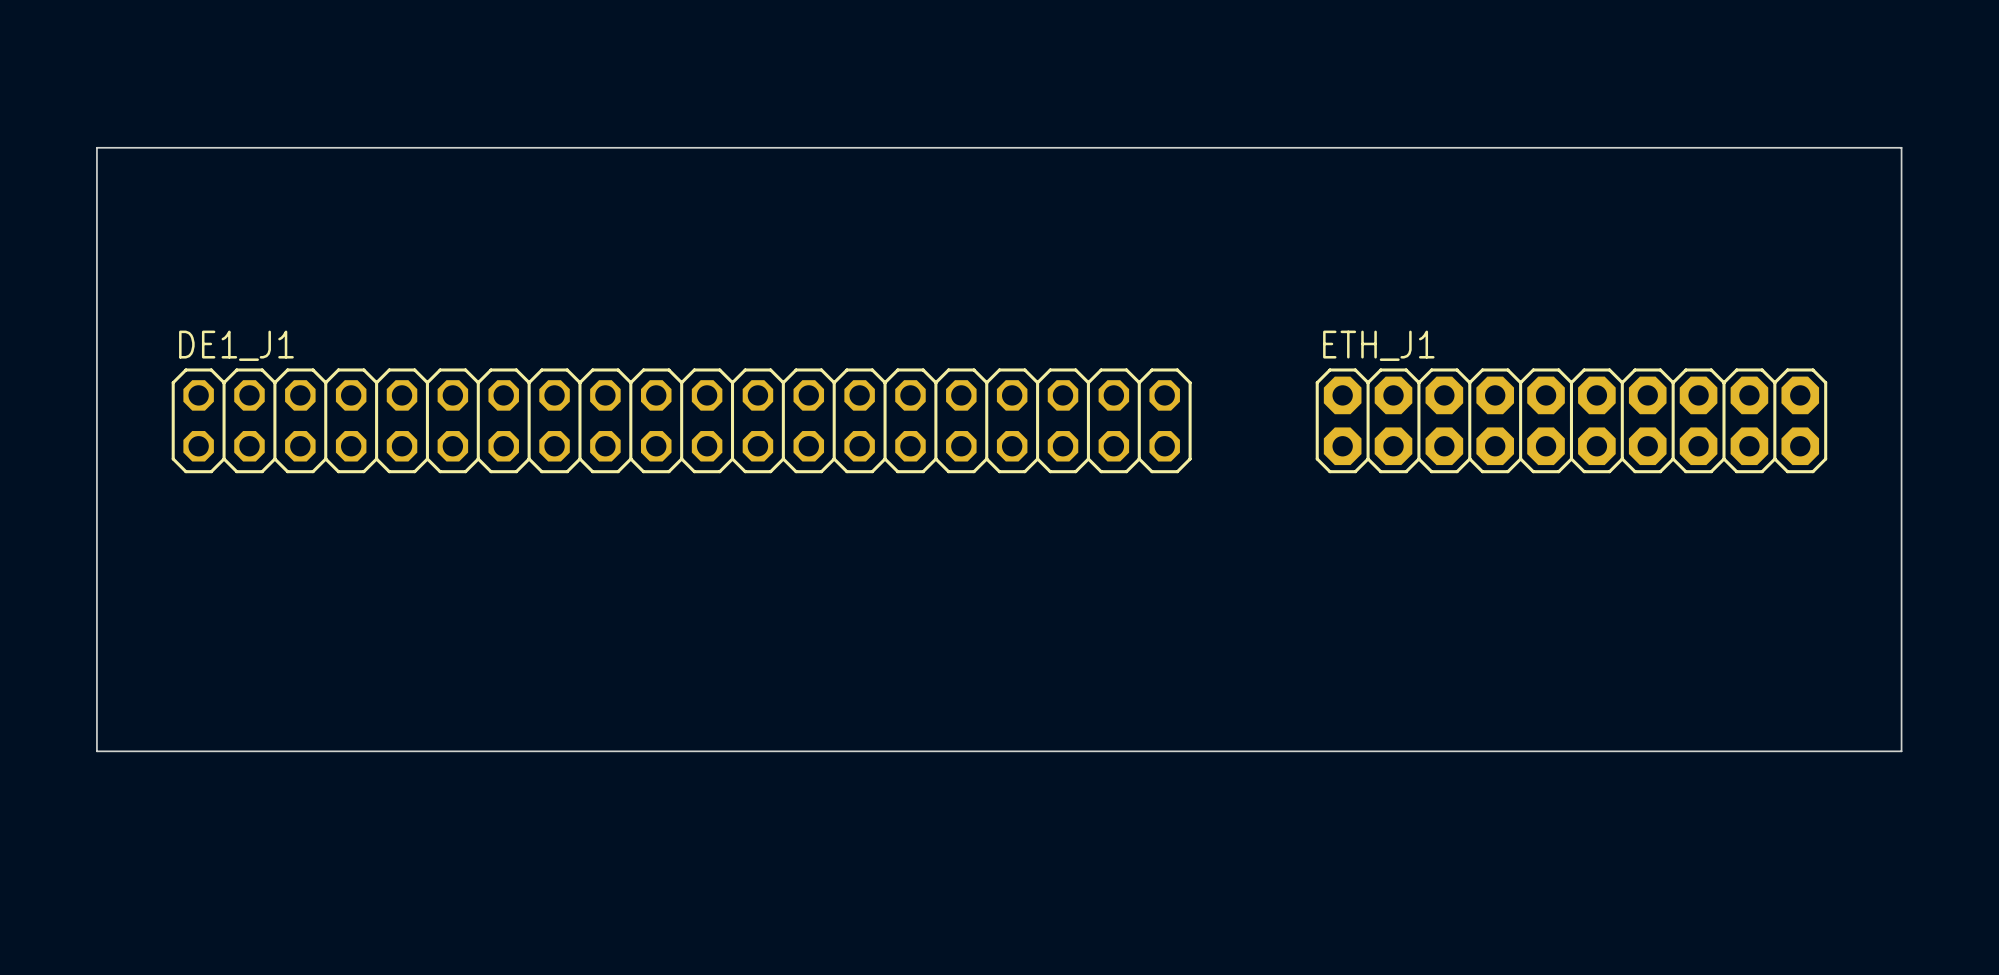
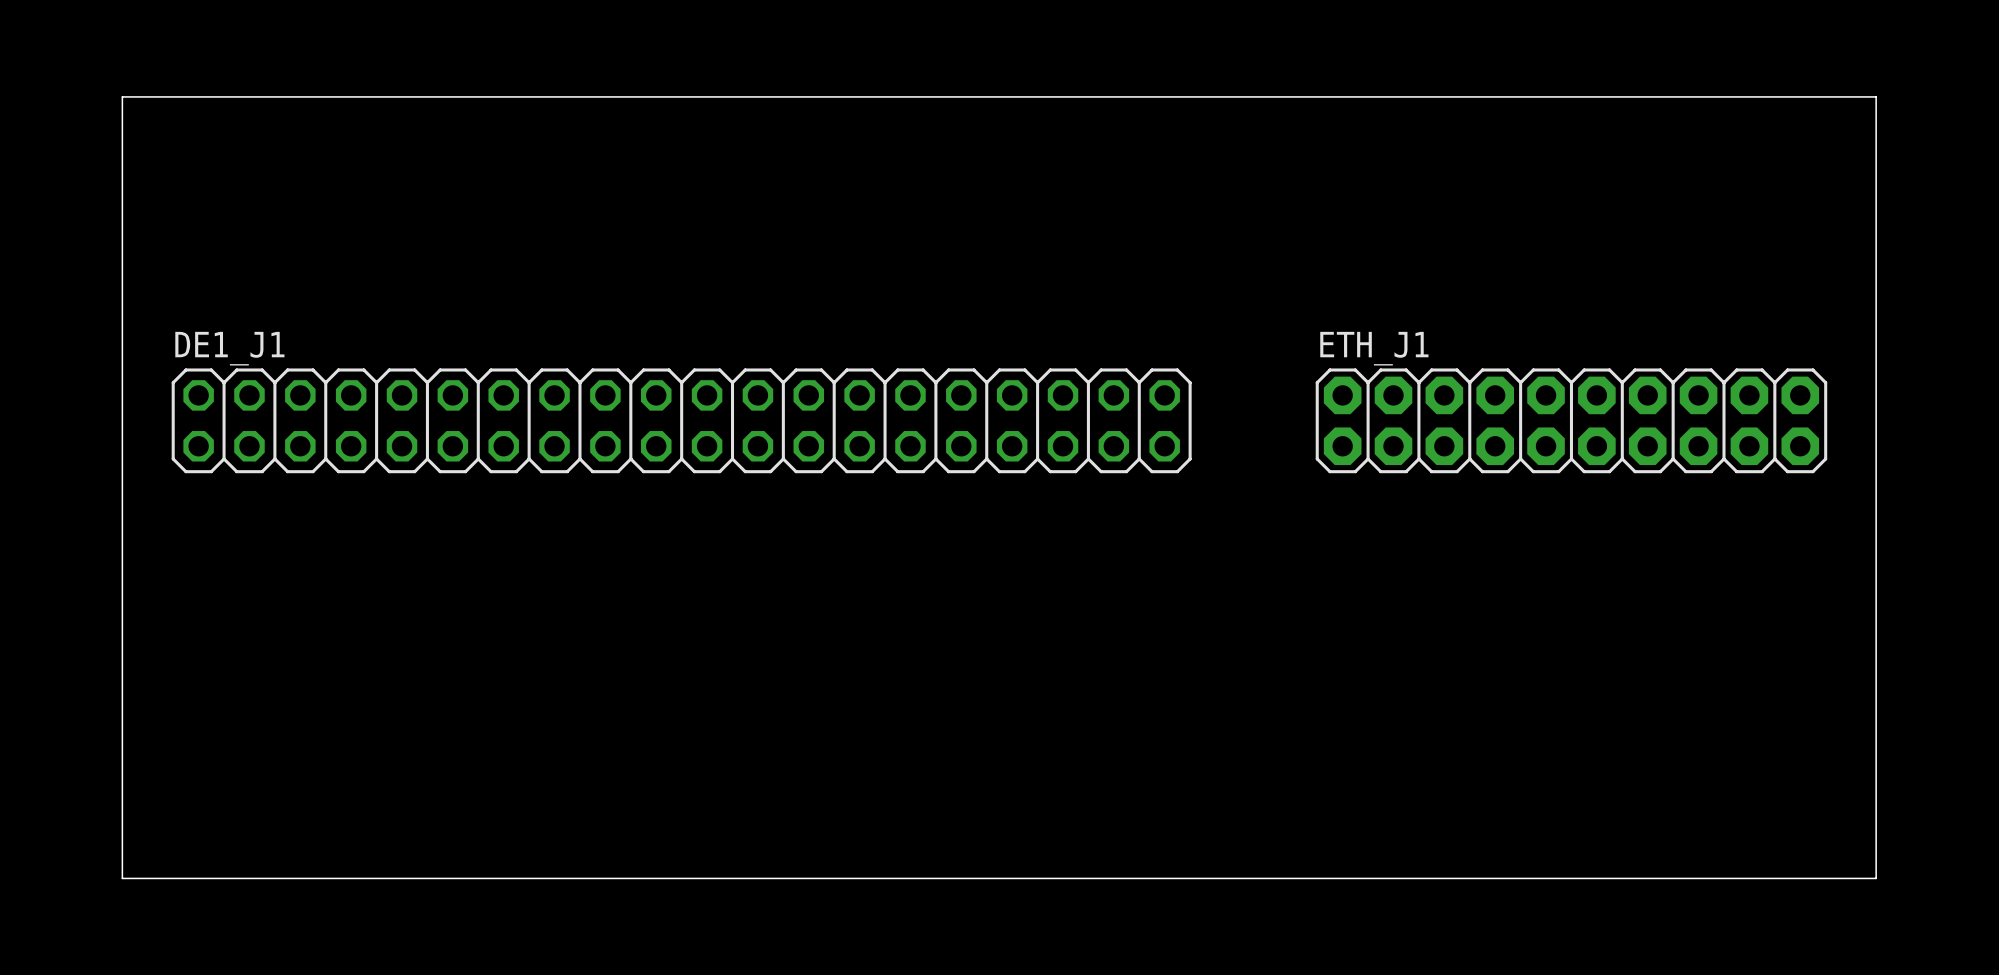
board edge: (96, 147) (1901, 147) (1901, 751) (96, 751) (96, 147) -> (122, 96) (122, 878) (1876, 878) (1876, 96) (122, 96)

